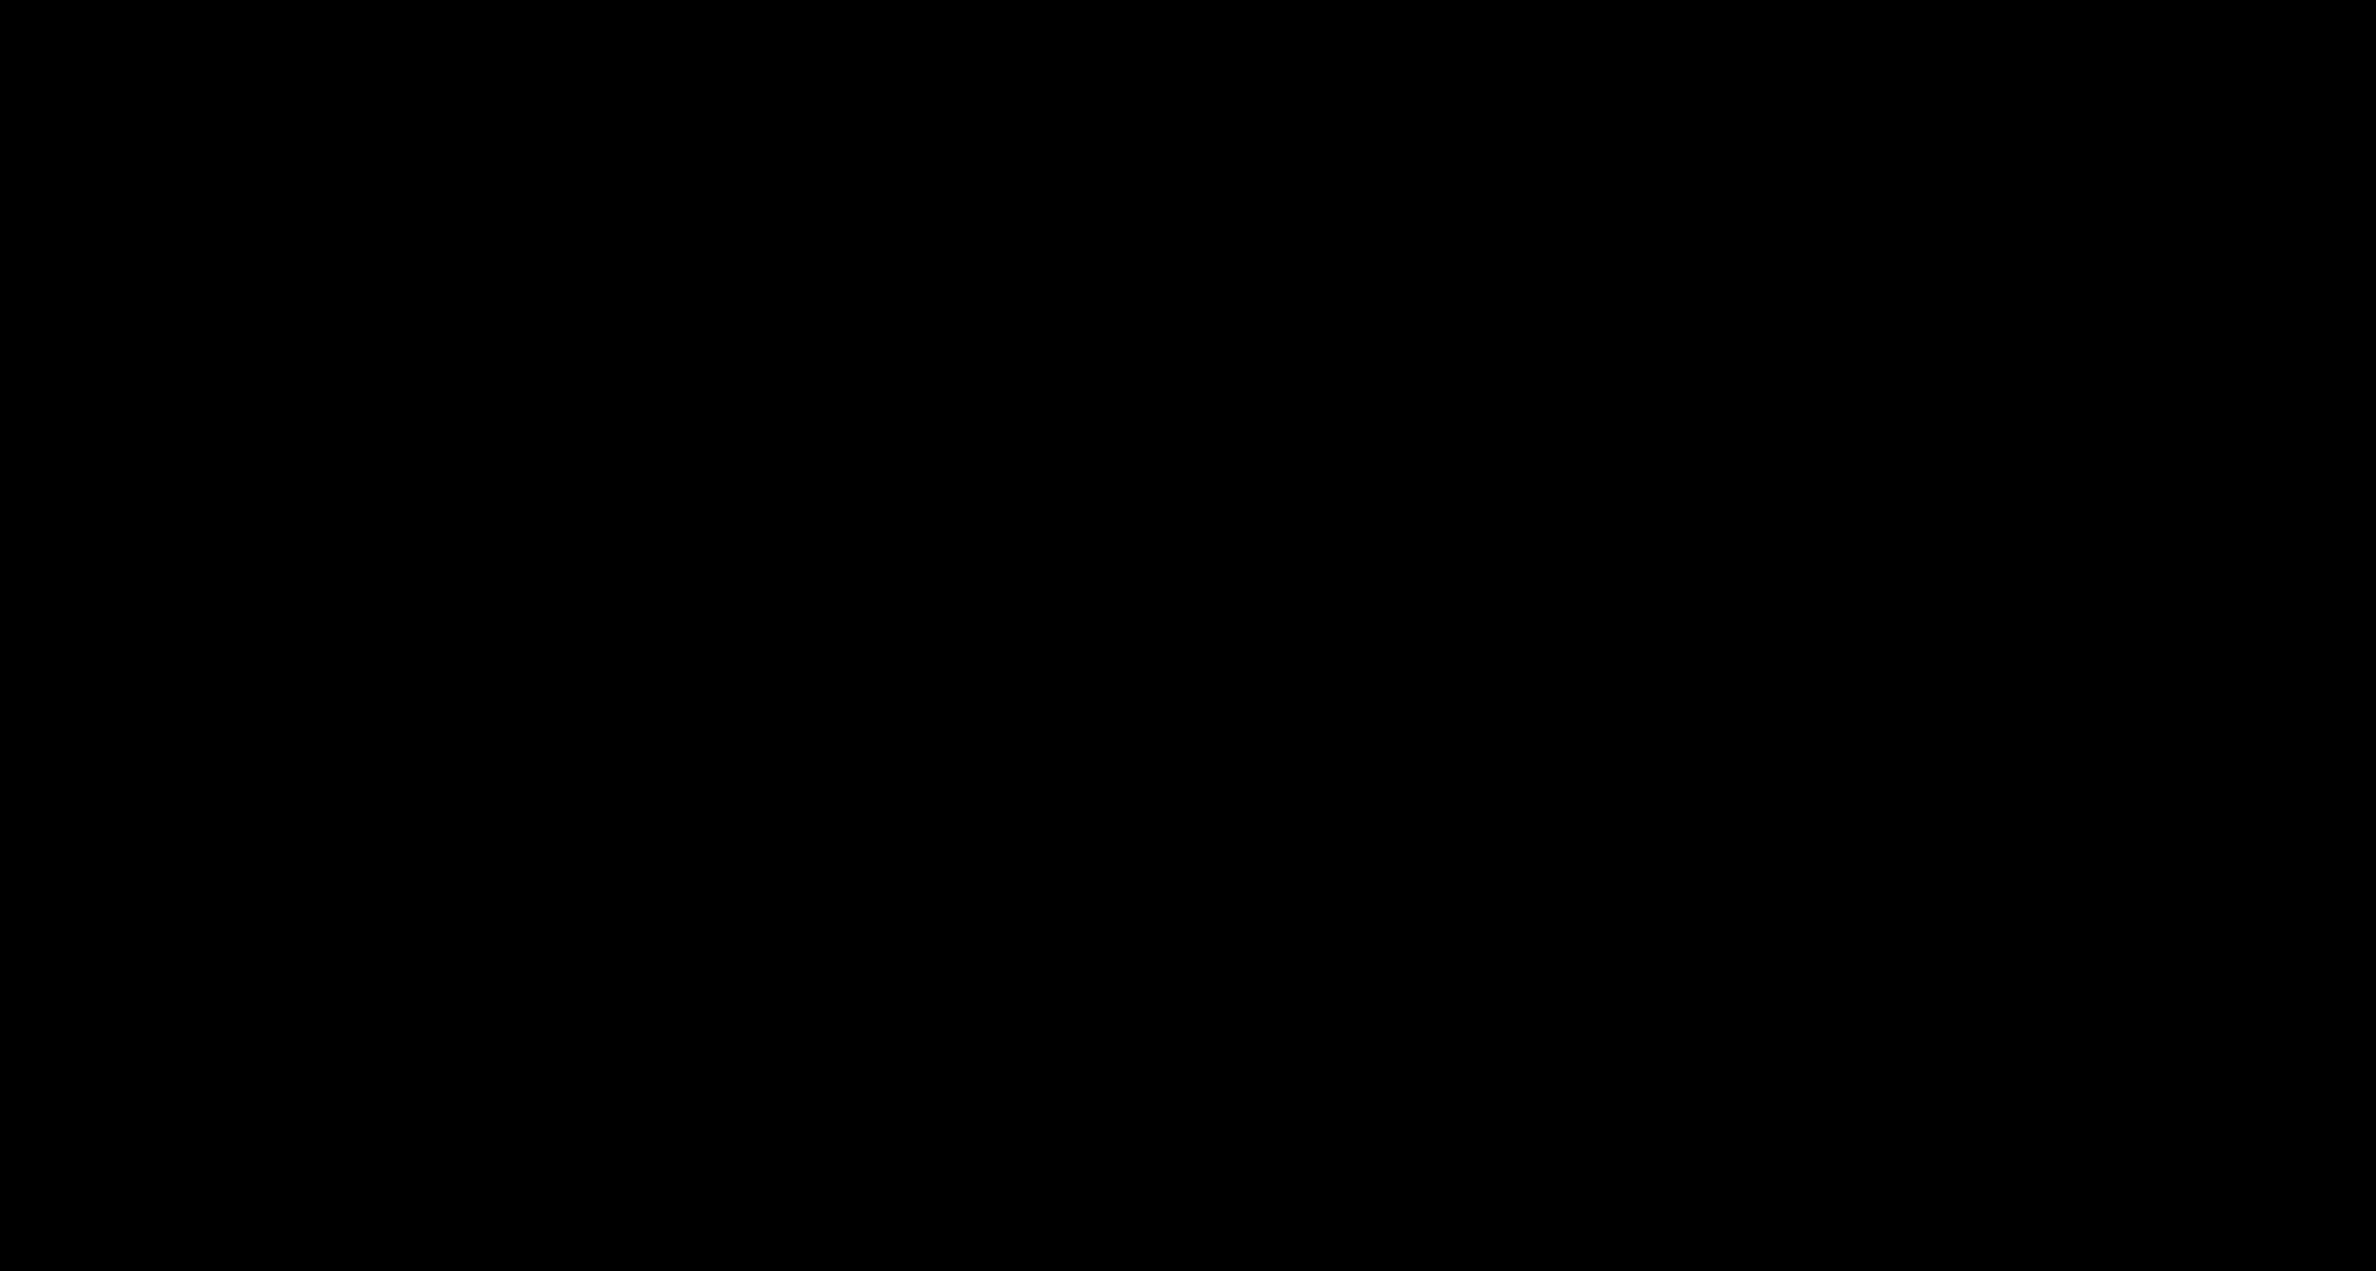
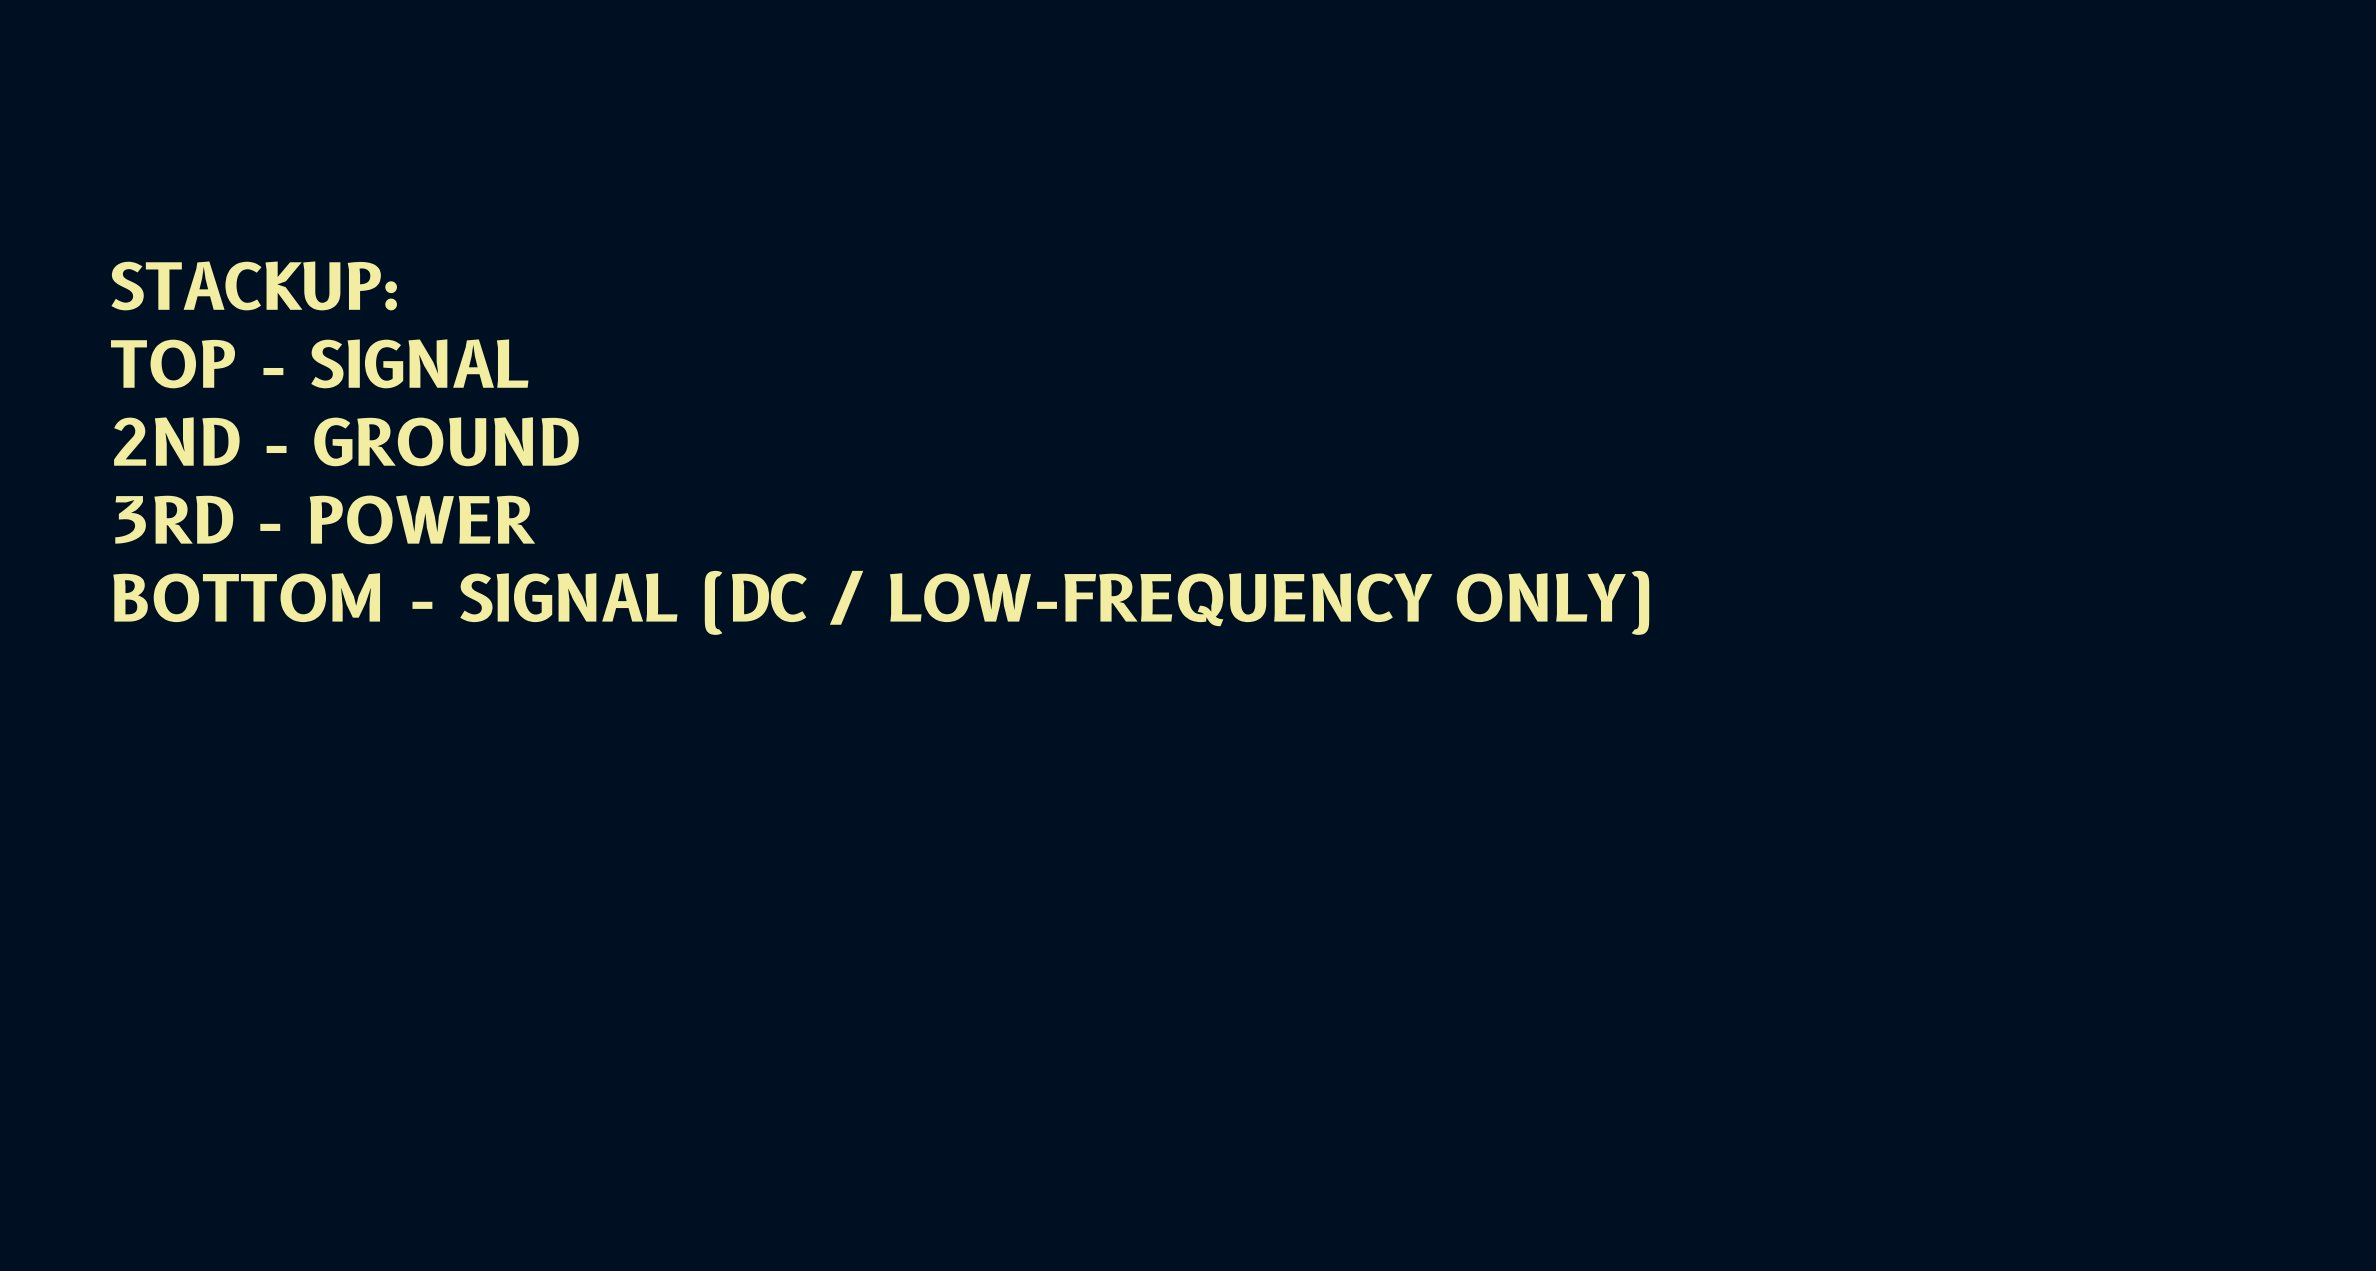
text: none -> STACKUP: (254, 285)
text: none -> TOP - SIGNAL (319, 363)
text: none -> 2ND - GROUND (346, 441)
text: none -> 3RD - POWER (325, 519)
text: none -> BOTTOM - SIGNAL (DC / LOW-FREQUENCY ONLY) (881, 602)

